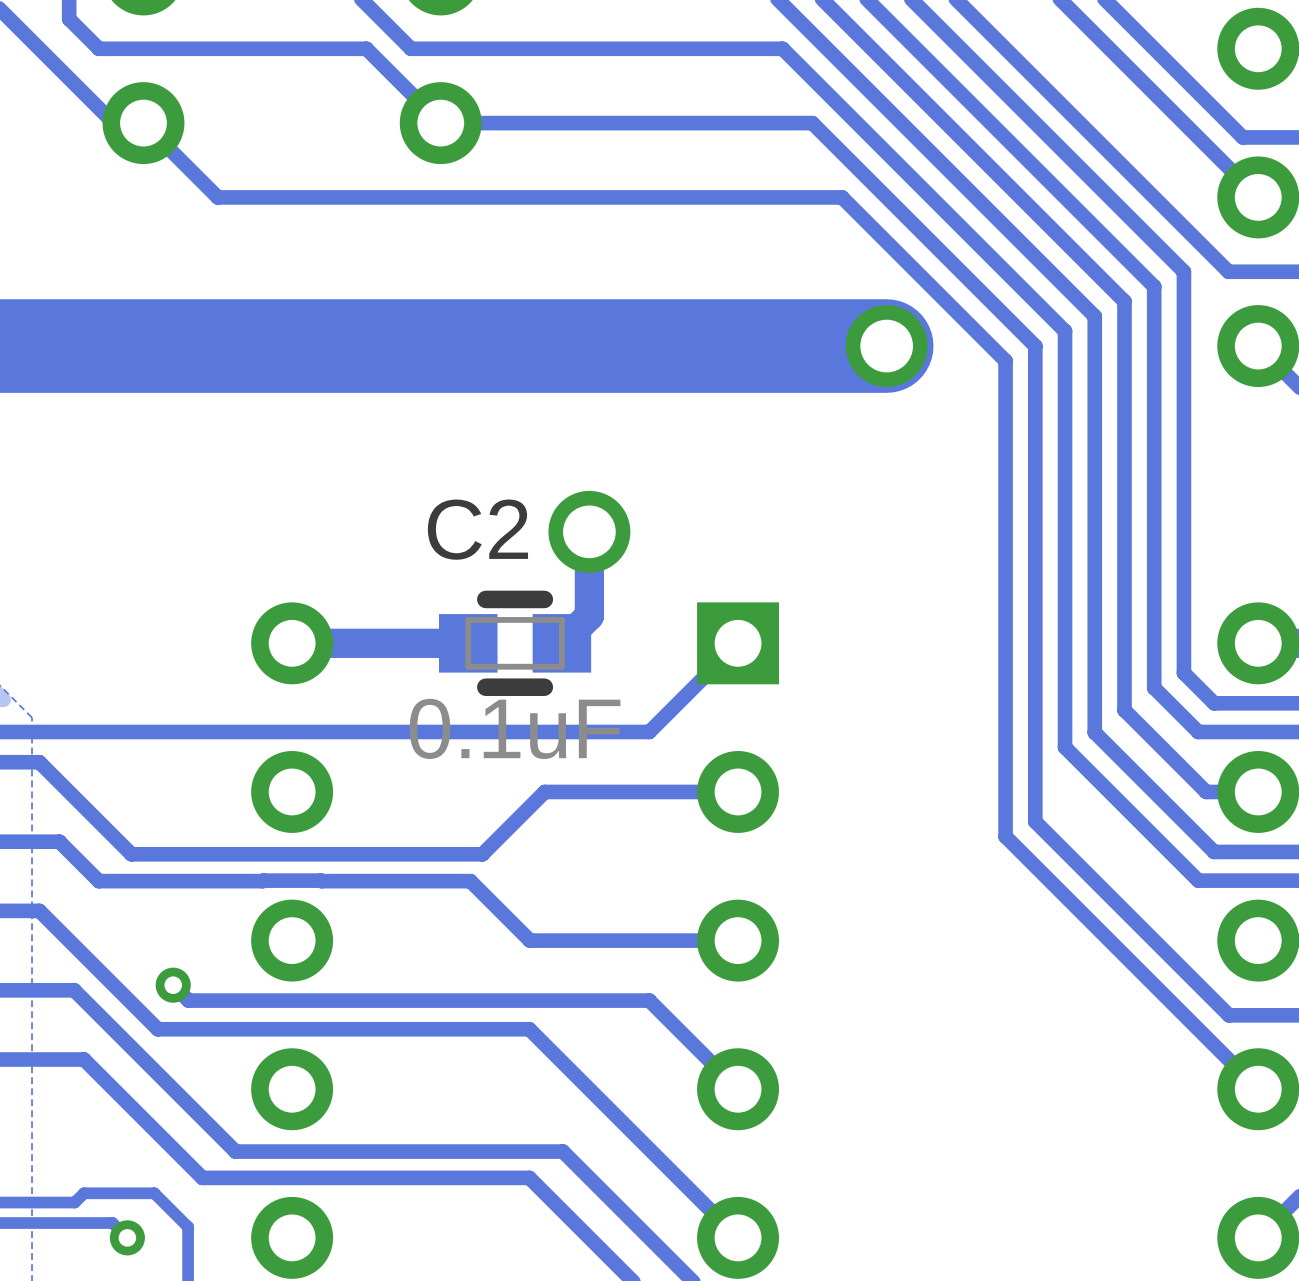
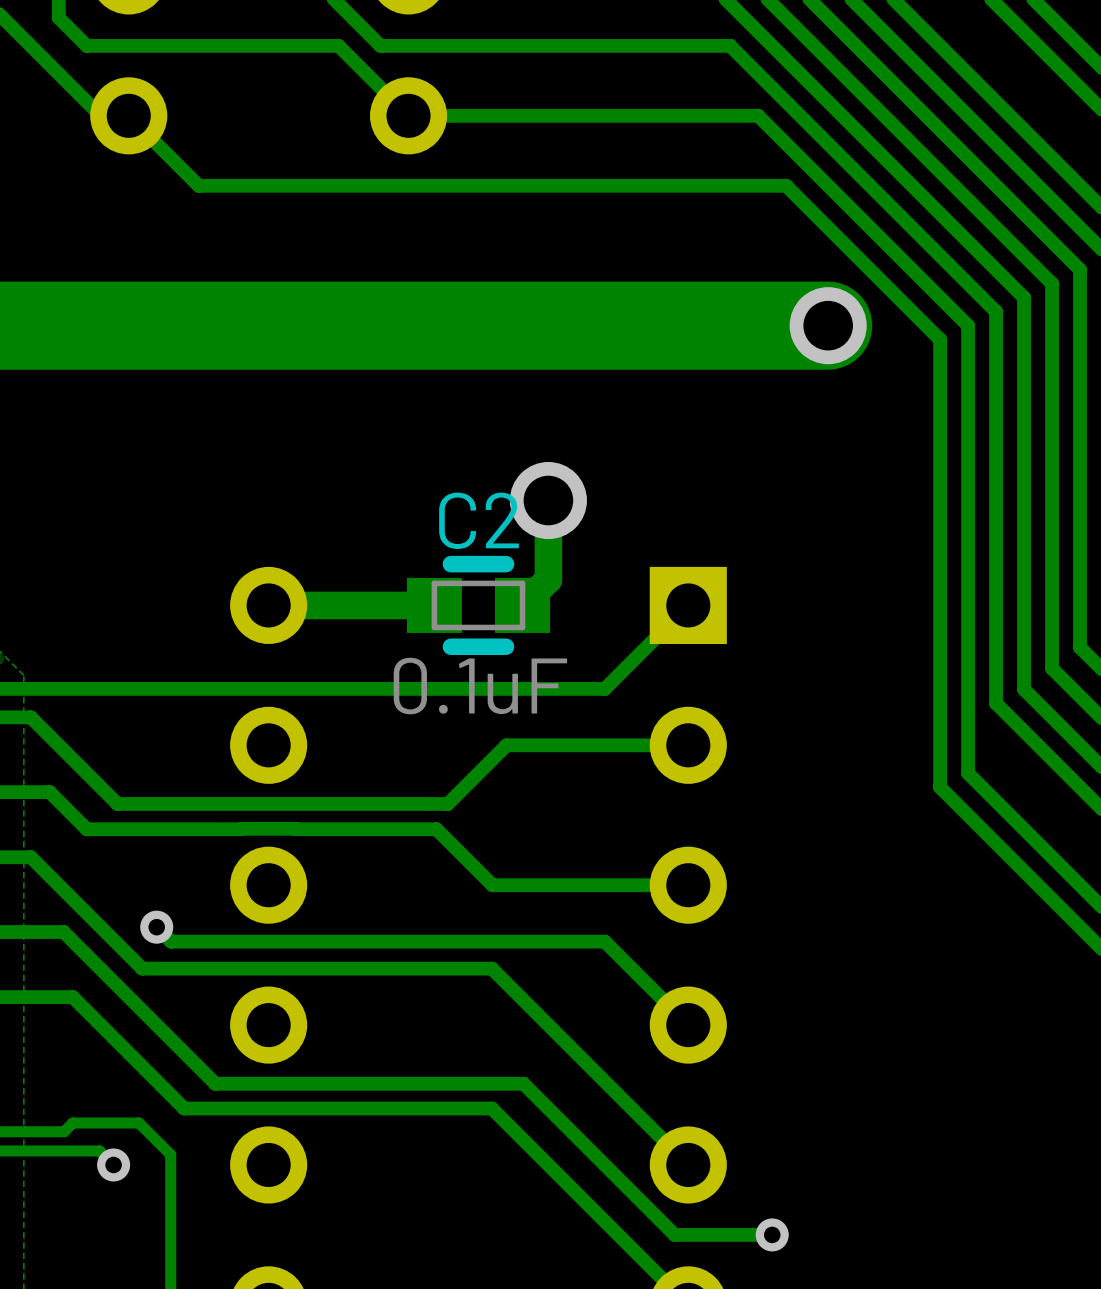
C2 name position: C2 (477, 529) -> C2 (479, 520)

